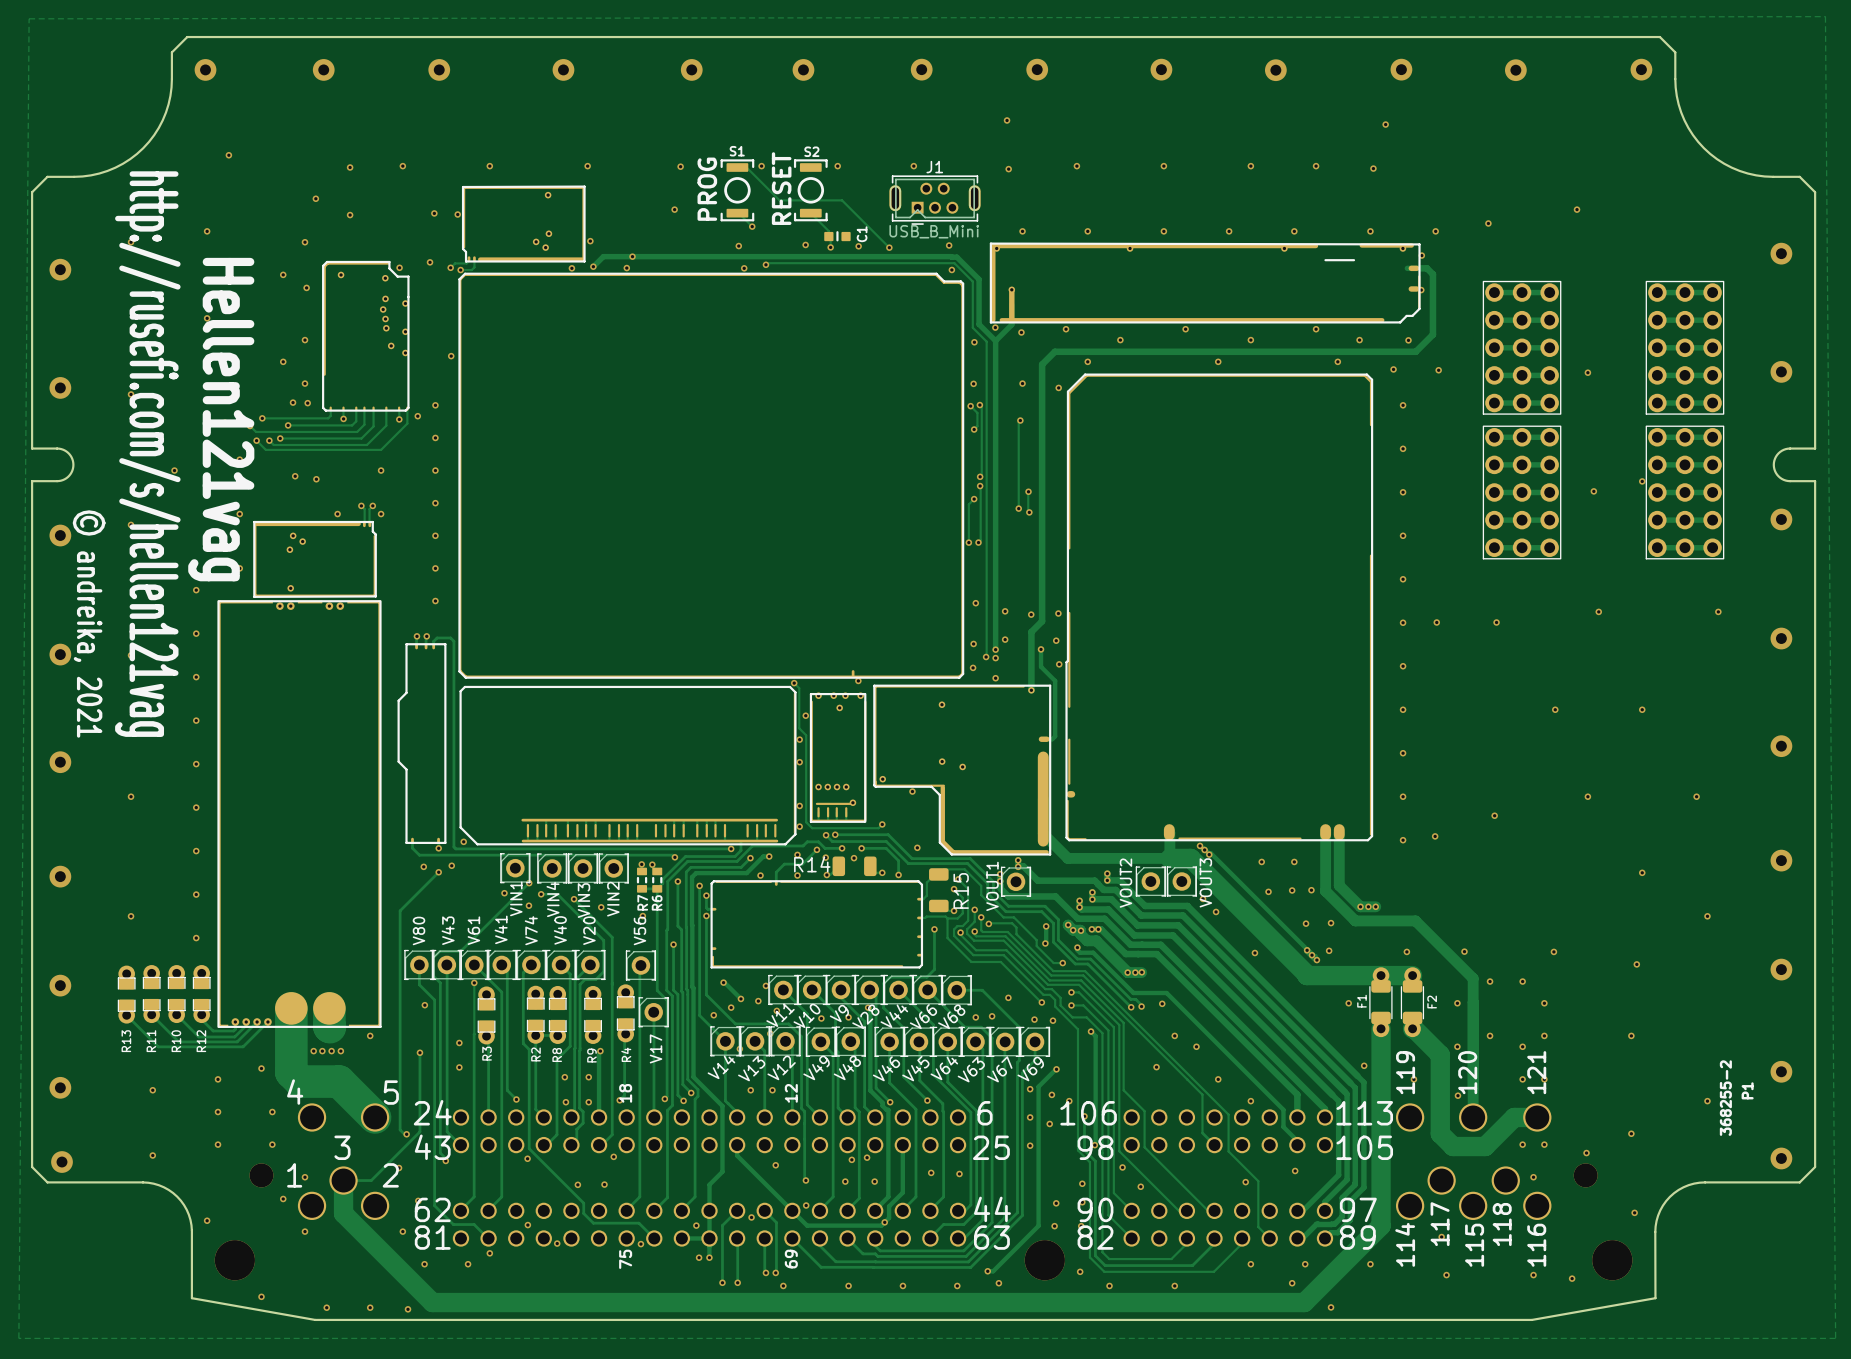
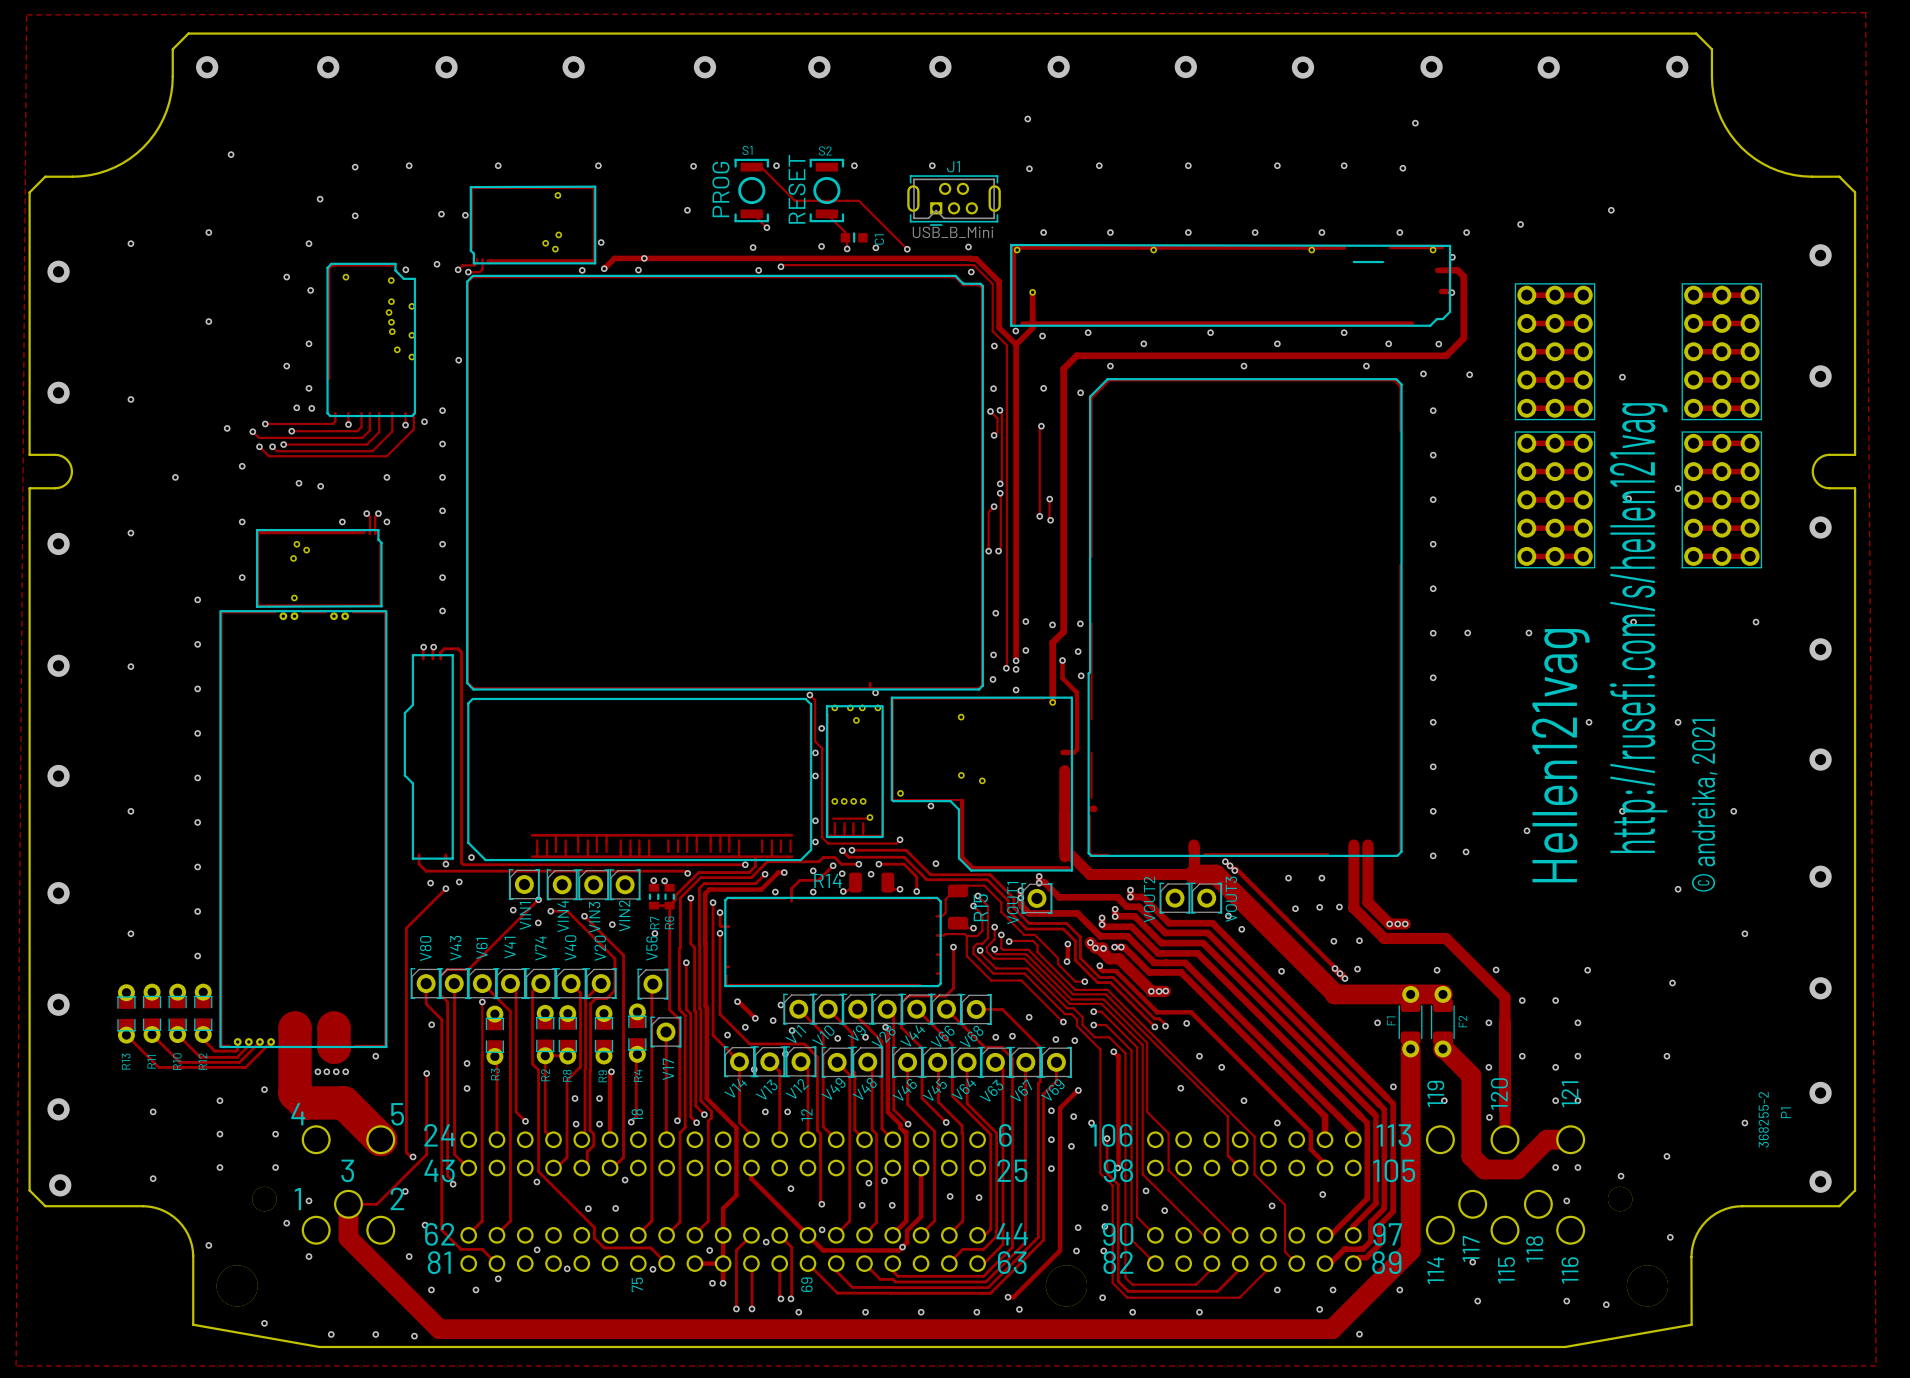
text: Hellen121vag (221, 419) -> none
text: http://rusefi.com/s/hellen121vag (147, 454) -> none
text: none -> http://rusefi.com/s/hellen121vag (1638, 628)
text: © andreika, 2021 (89, 623) -> none
text: none -> Hellen121vag (1560, 755)
text: none -> © andreika, 2021 (1704, 805)

